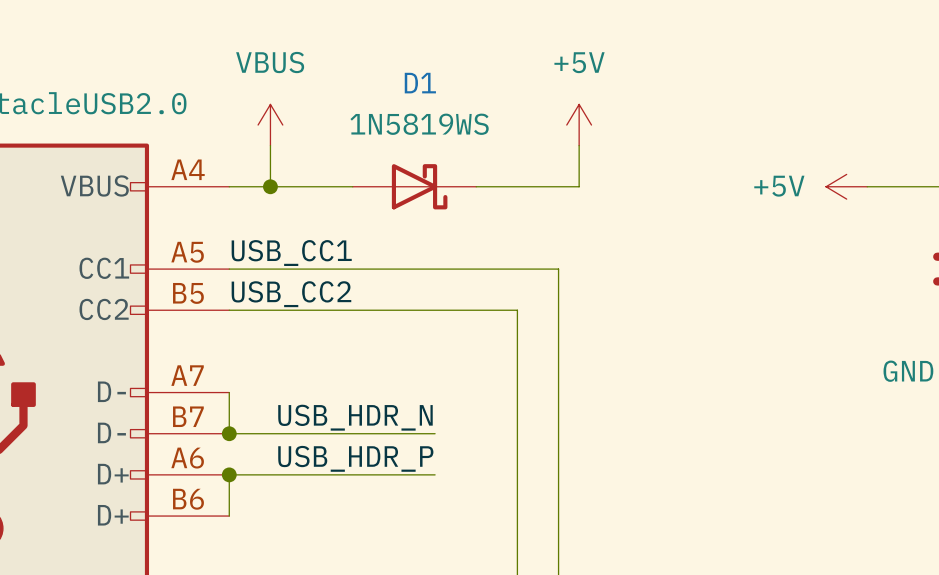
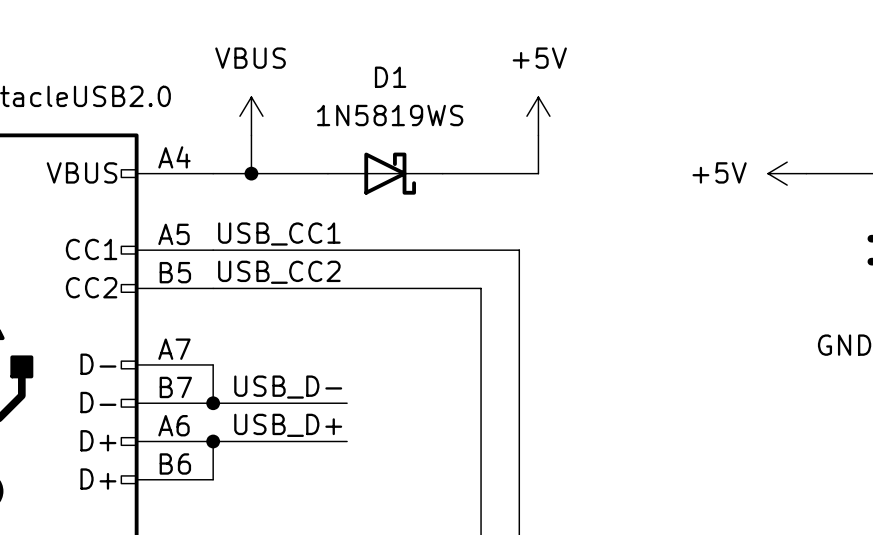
label: none -> USB_D- (288, 387)
label: USB_HDR_N (355, 417) -> none
wire: (373, 433) (435, 433) -> none
label: none -> USB_D+ (288, 425)
label: USB_HDR_P (355, 458) -> none
wire: (373, 474) (435, 474) -> none

